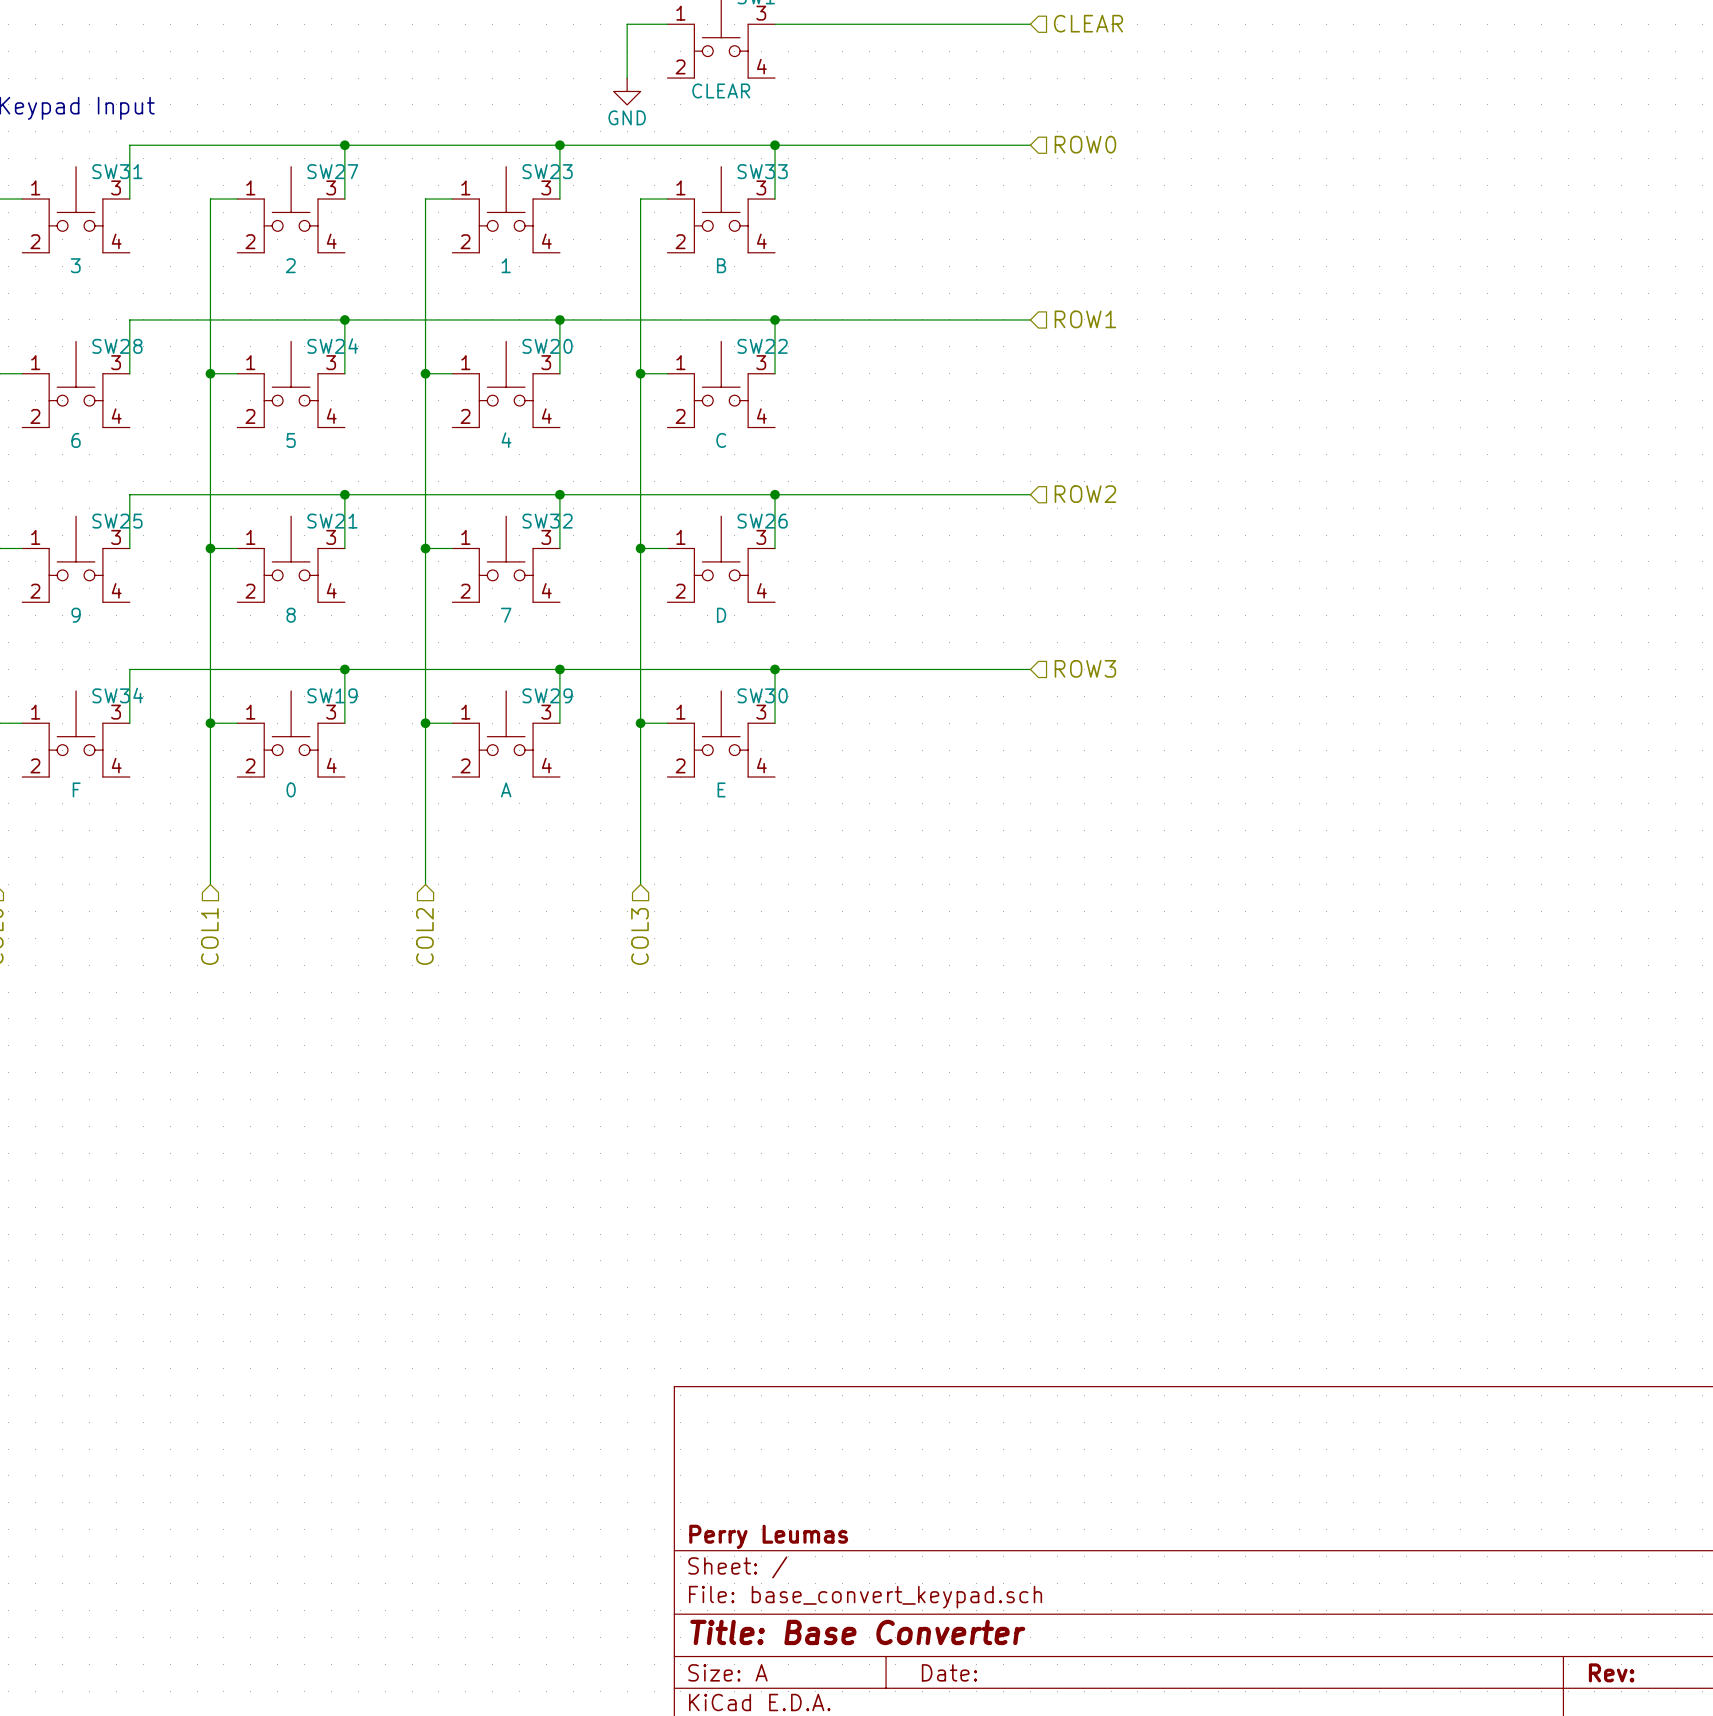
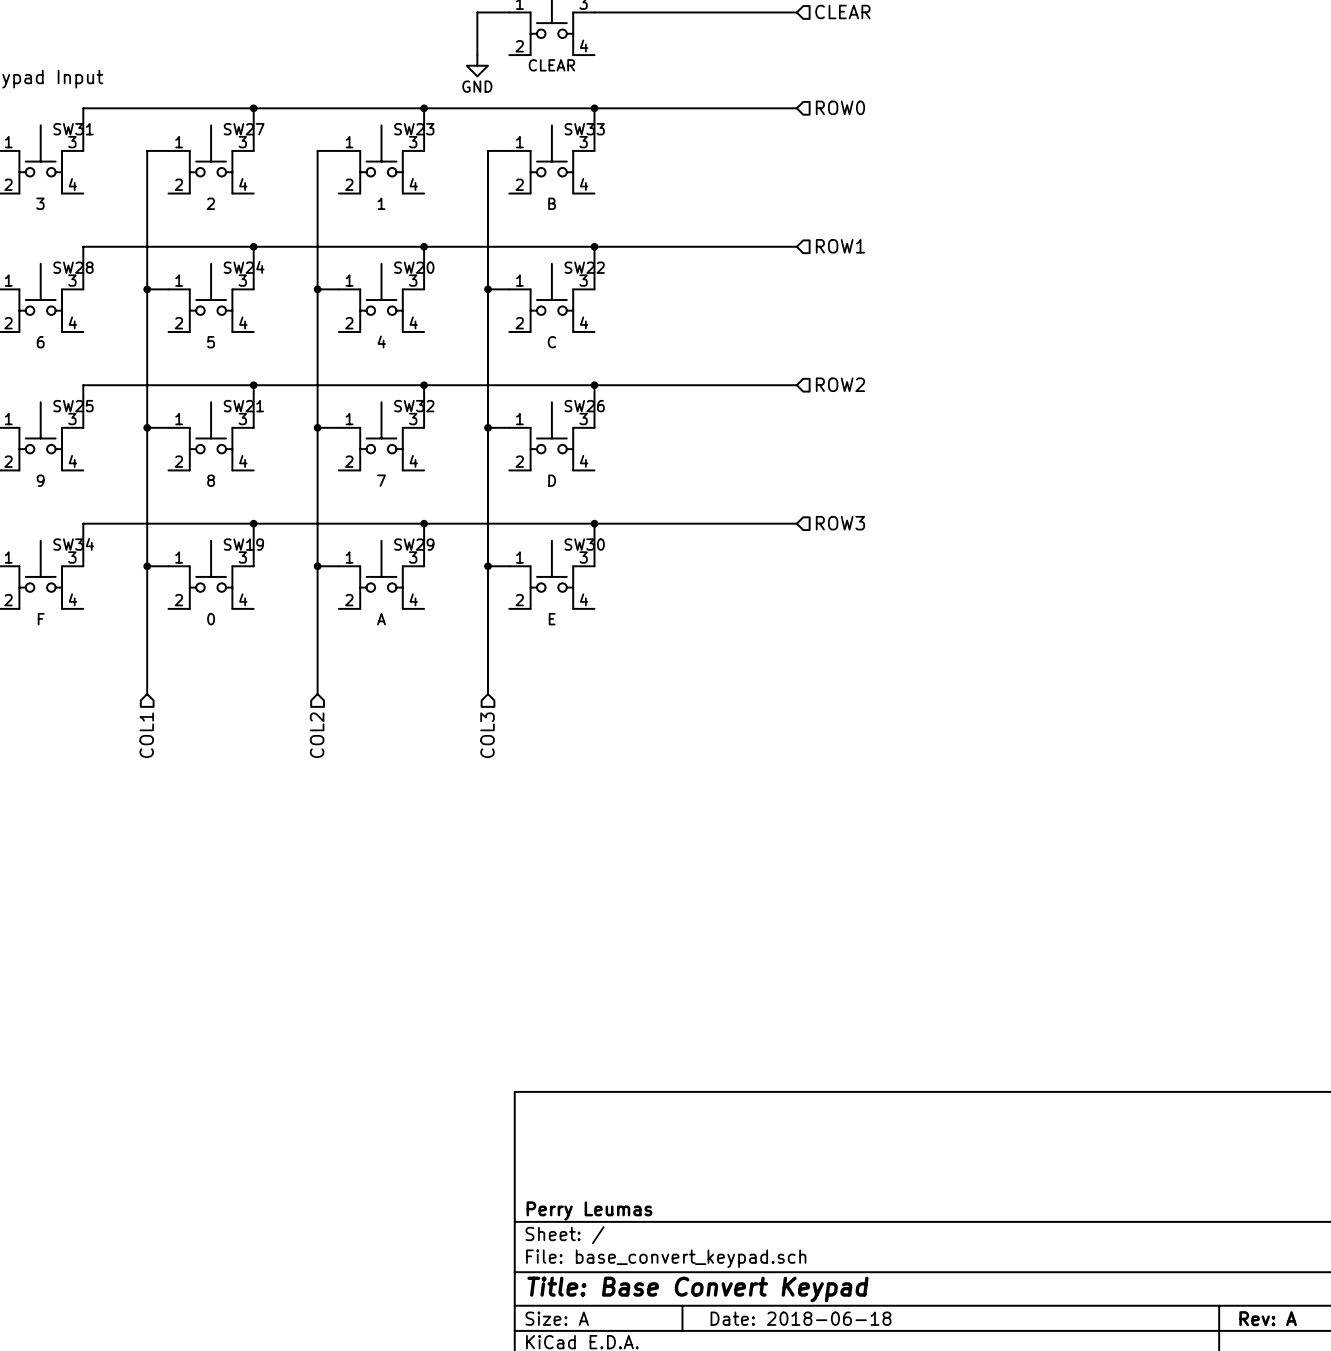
title block: Title: Base Converter (857, 1632) -> Title: Base Convert Keypad (697, 1289)
title block: Date: (949, 1672) -> Date: 2018-06-18 (801, 1318)
title block: Rev: (1611, 1672) -> Rev: A (1268, 1318)

